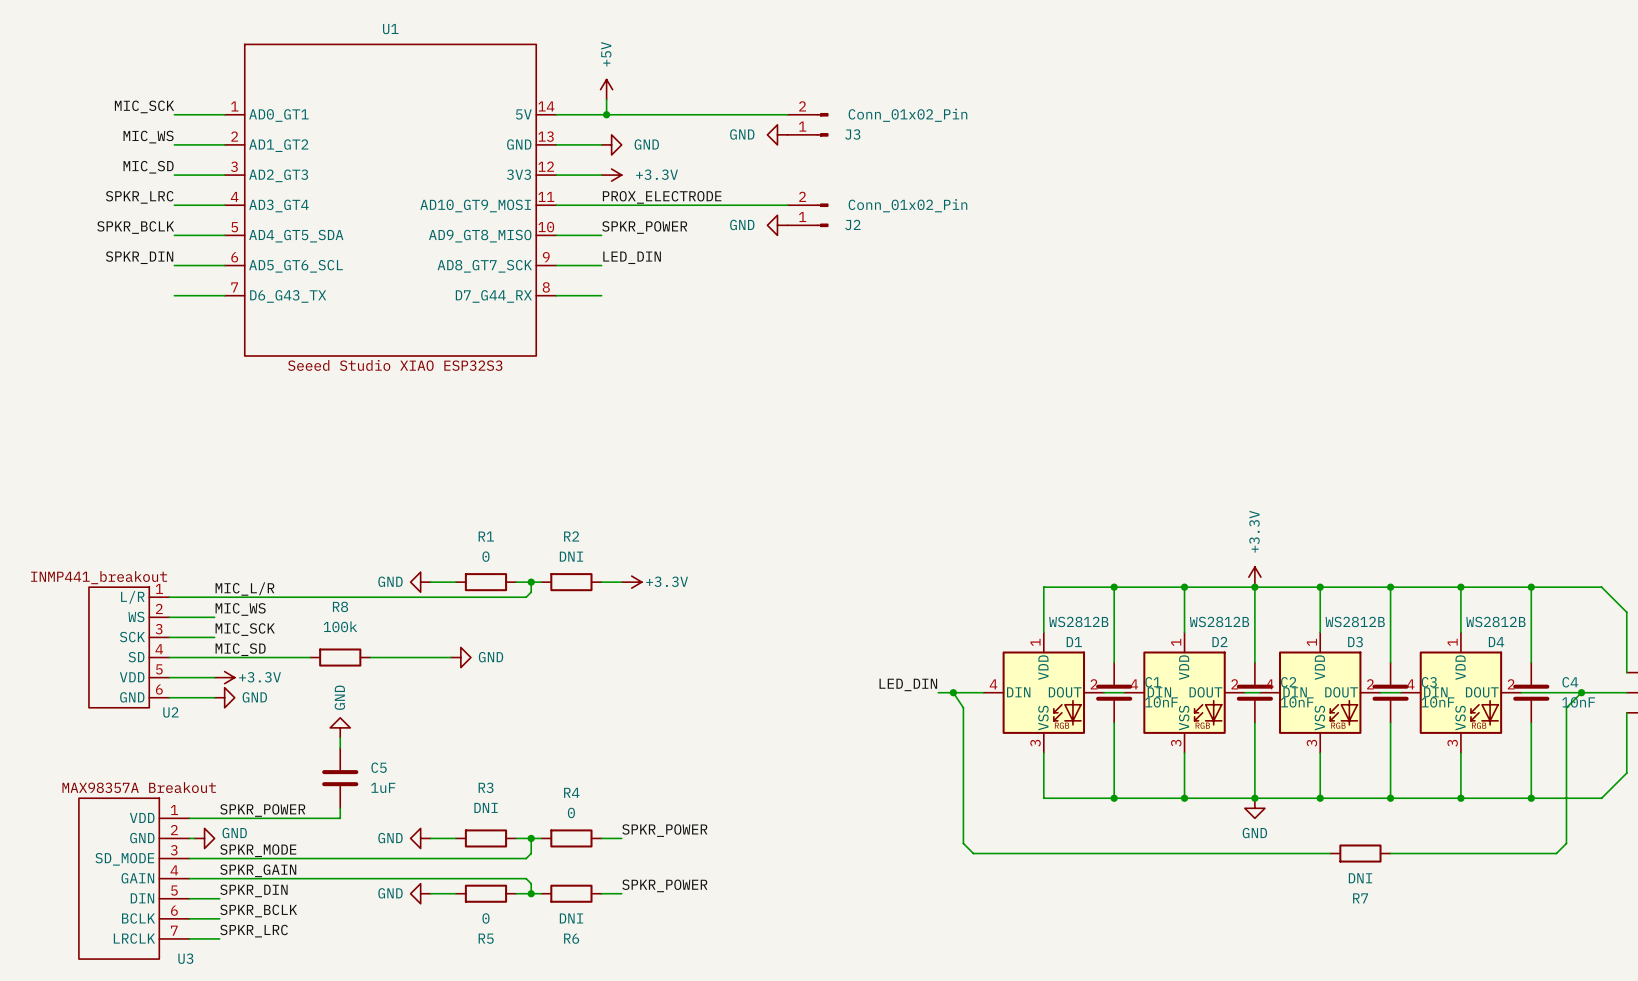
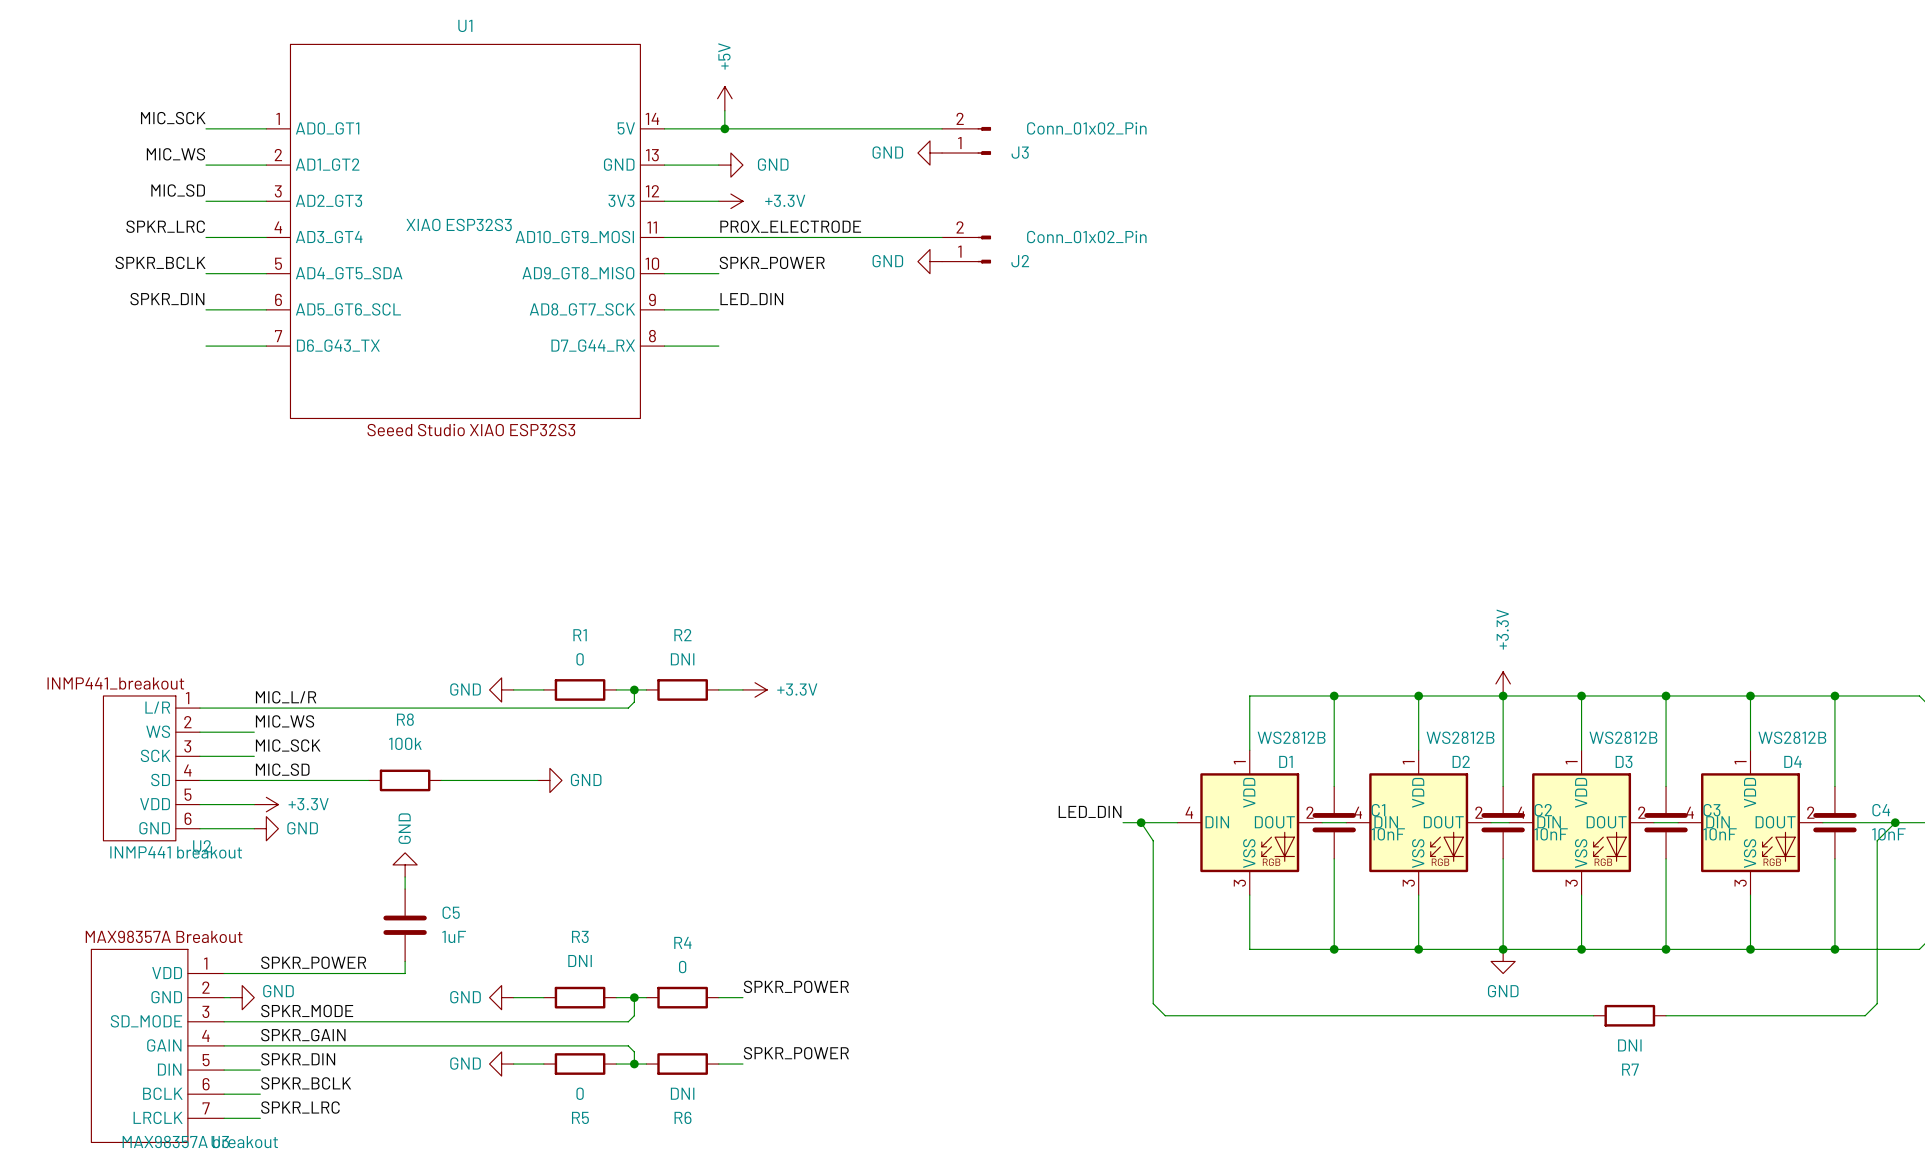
U1 value: none -> XIAO ESP32S3 (459, 224)
U2 value: none -> INMP441 breakout (176, 852)
U3 value: none -> MAX98357A breakout (200, 1141)

